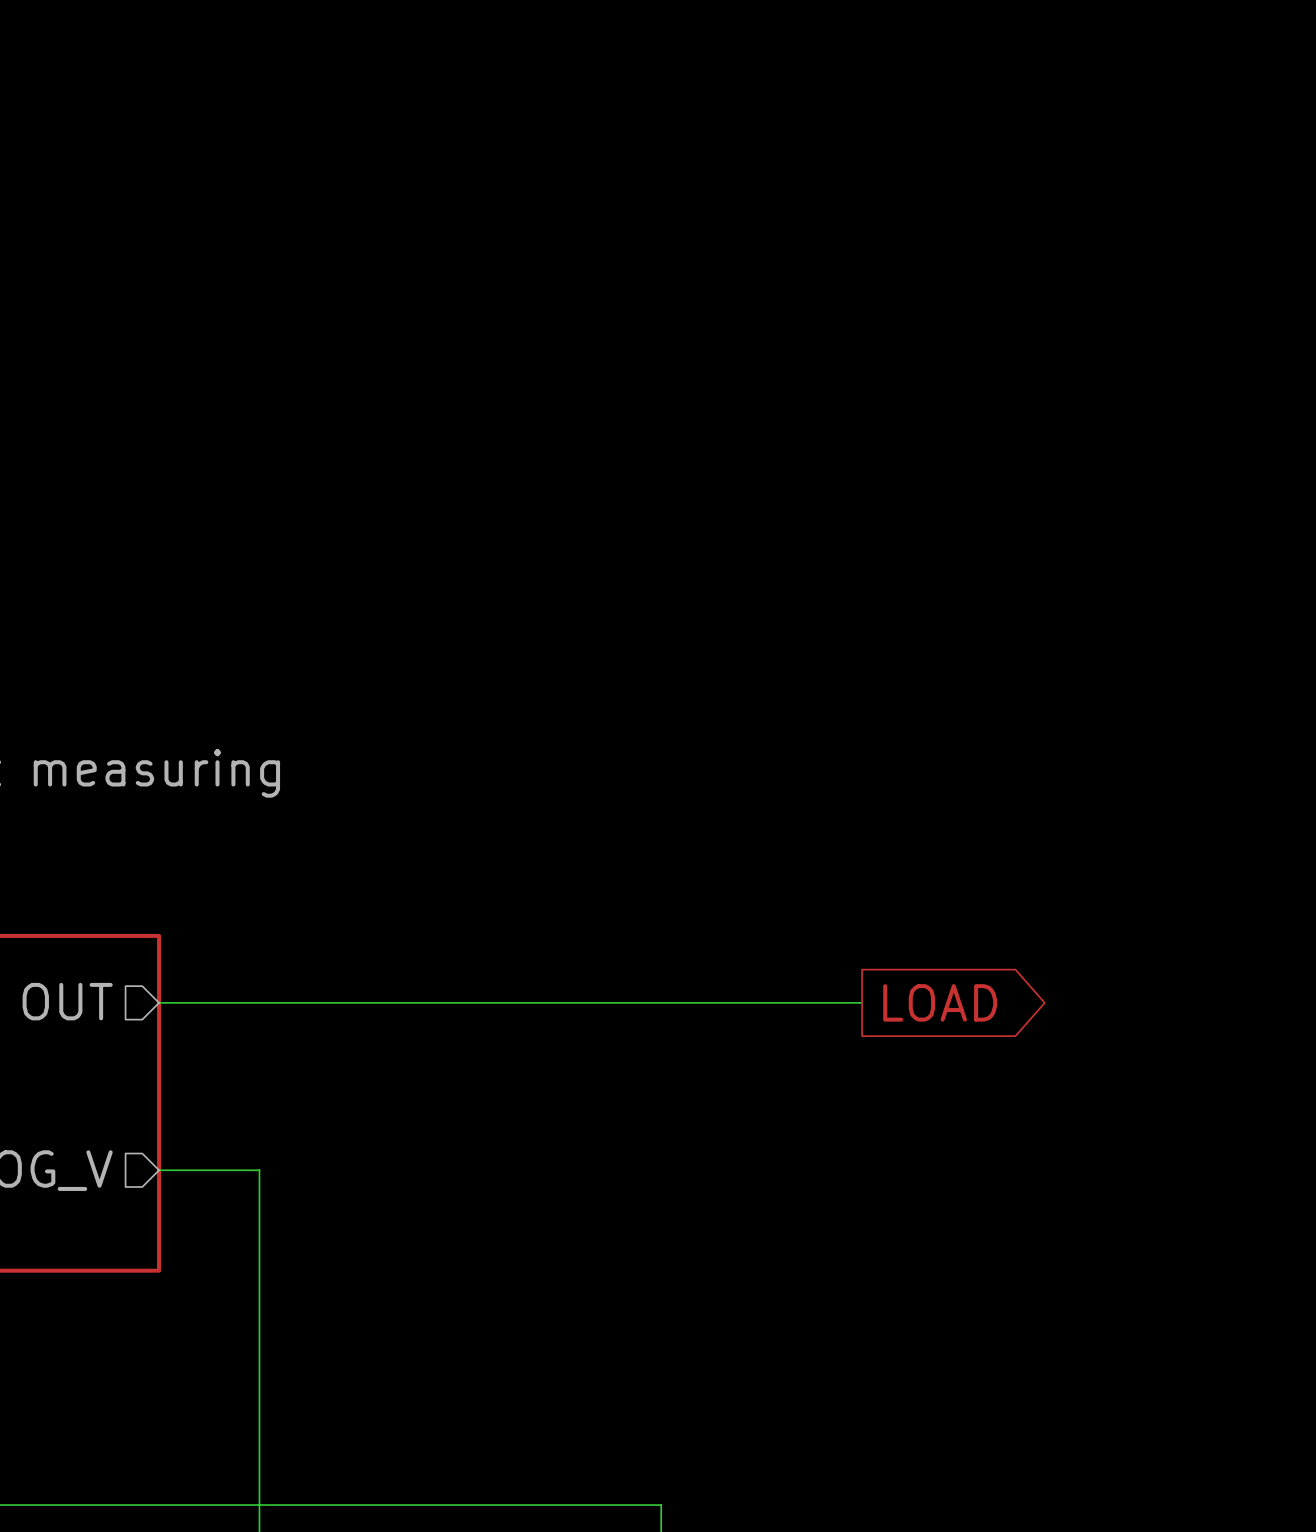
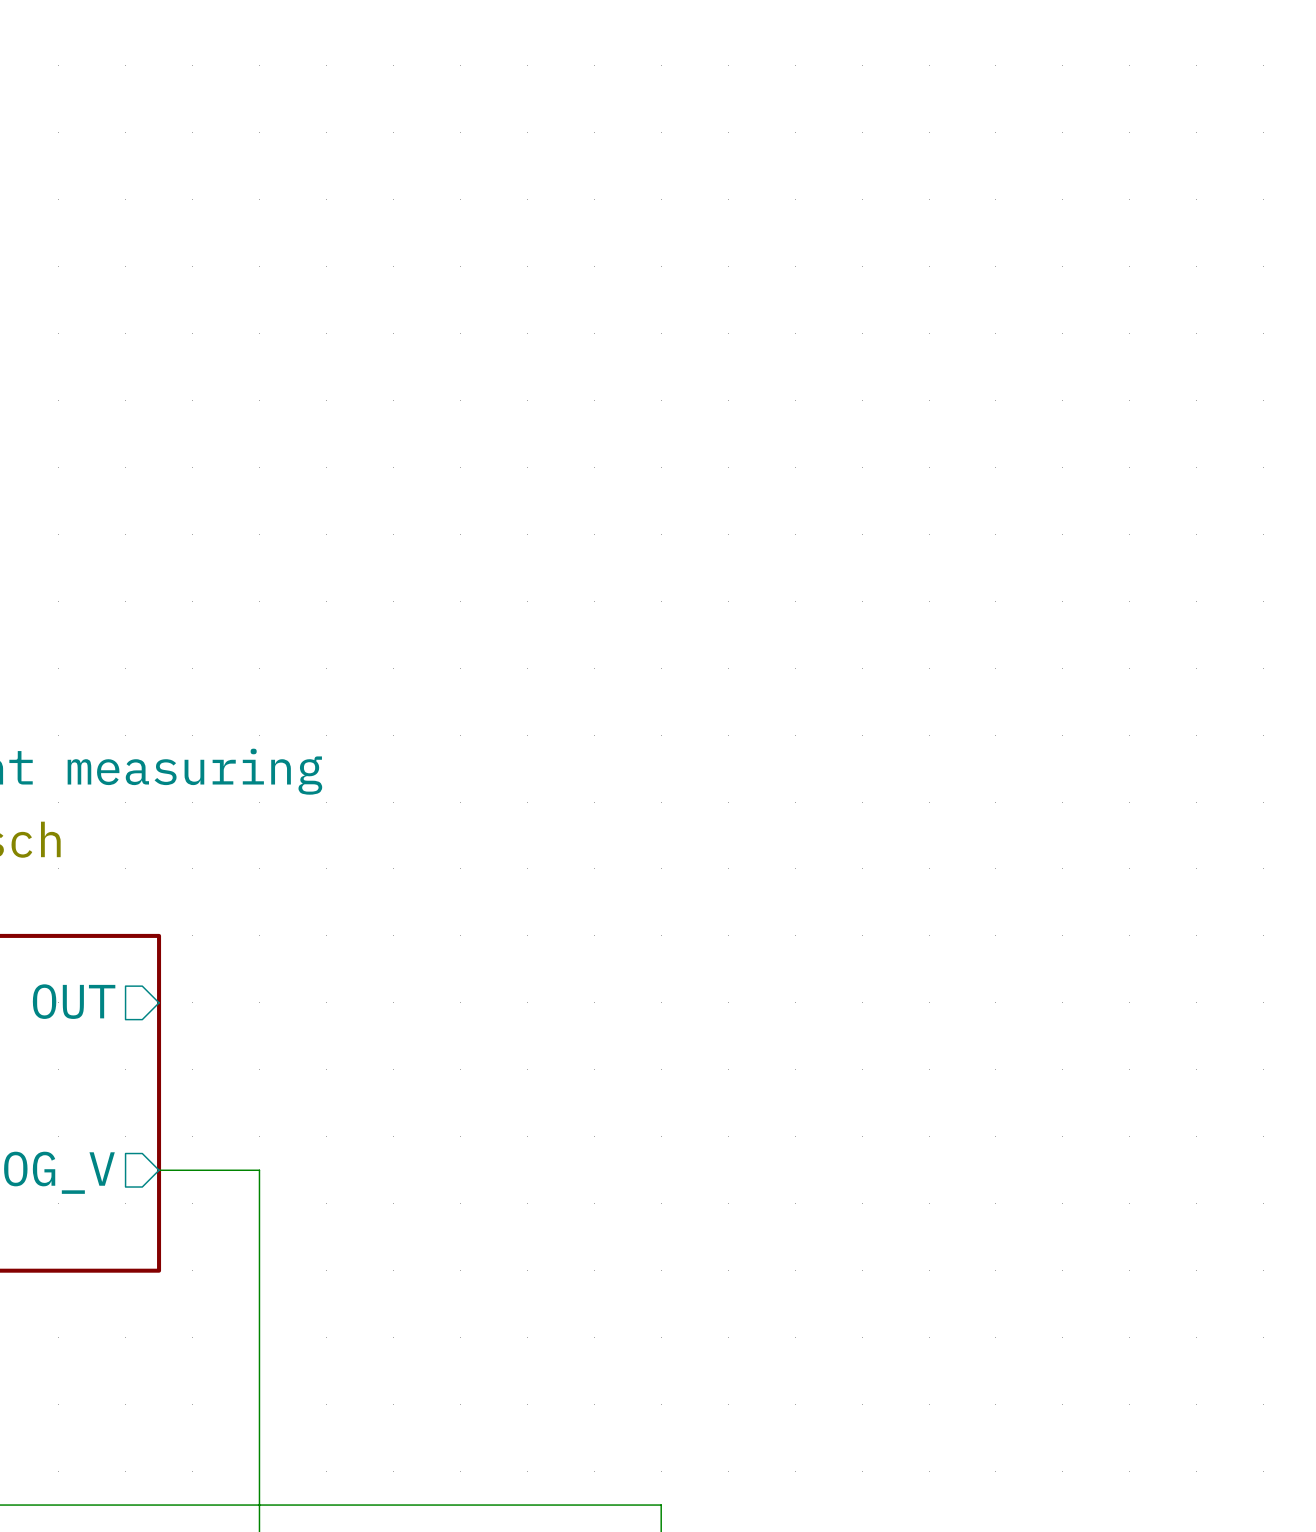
wire: (159, 1002) (862, 1002) -> none
global label: LOAD (940, 1002) -> none

